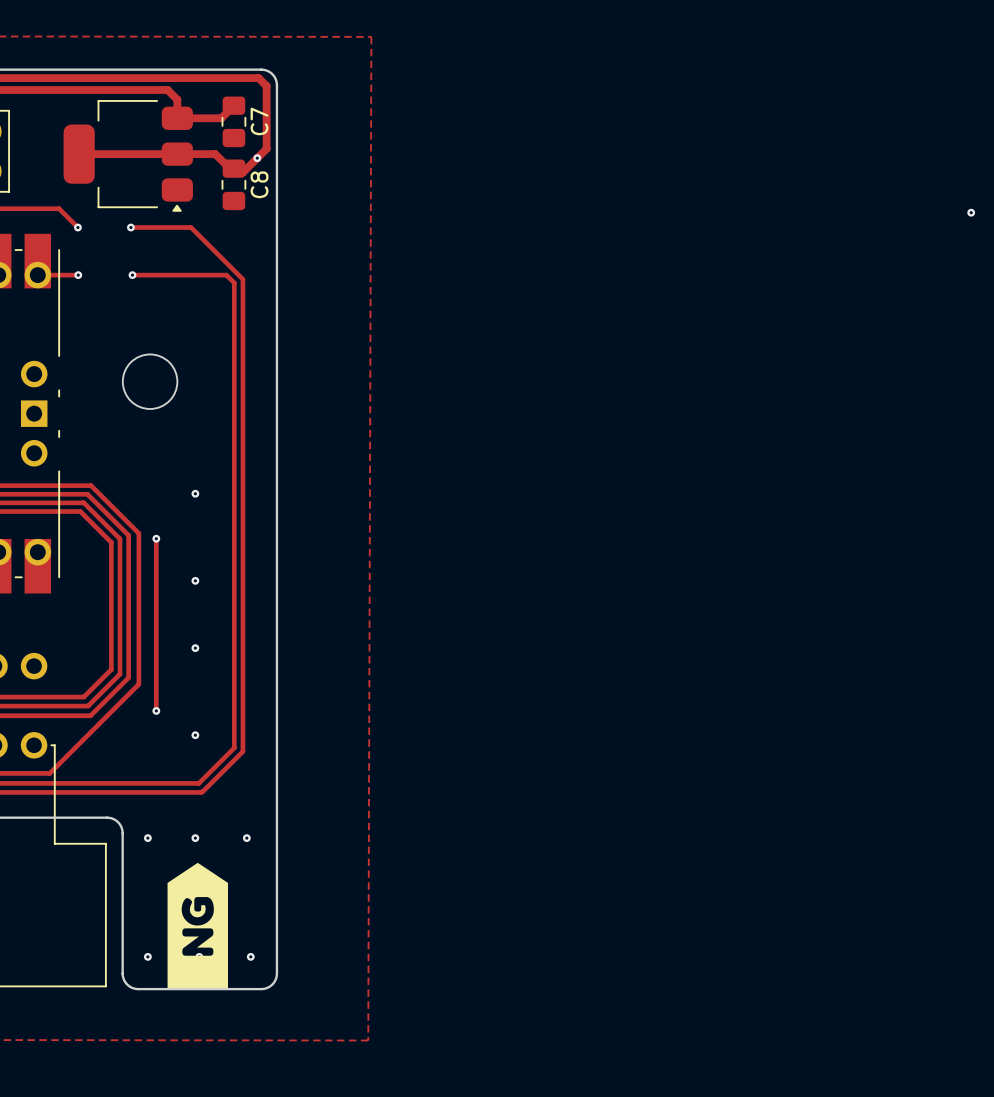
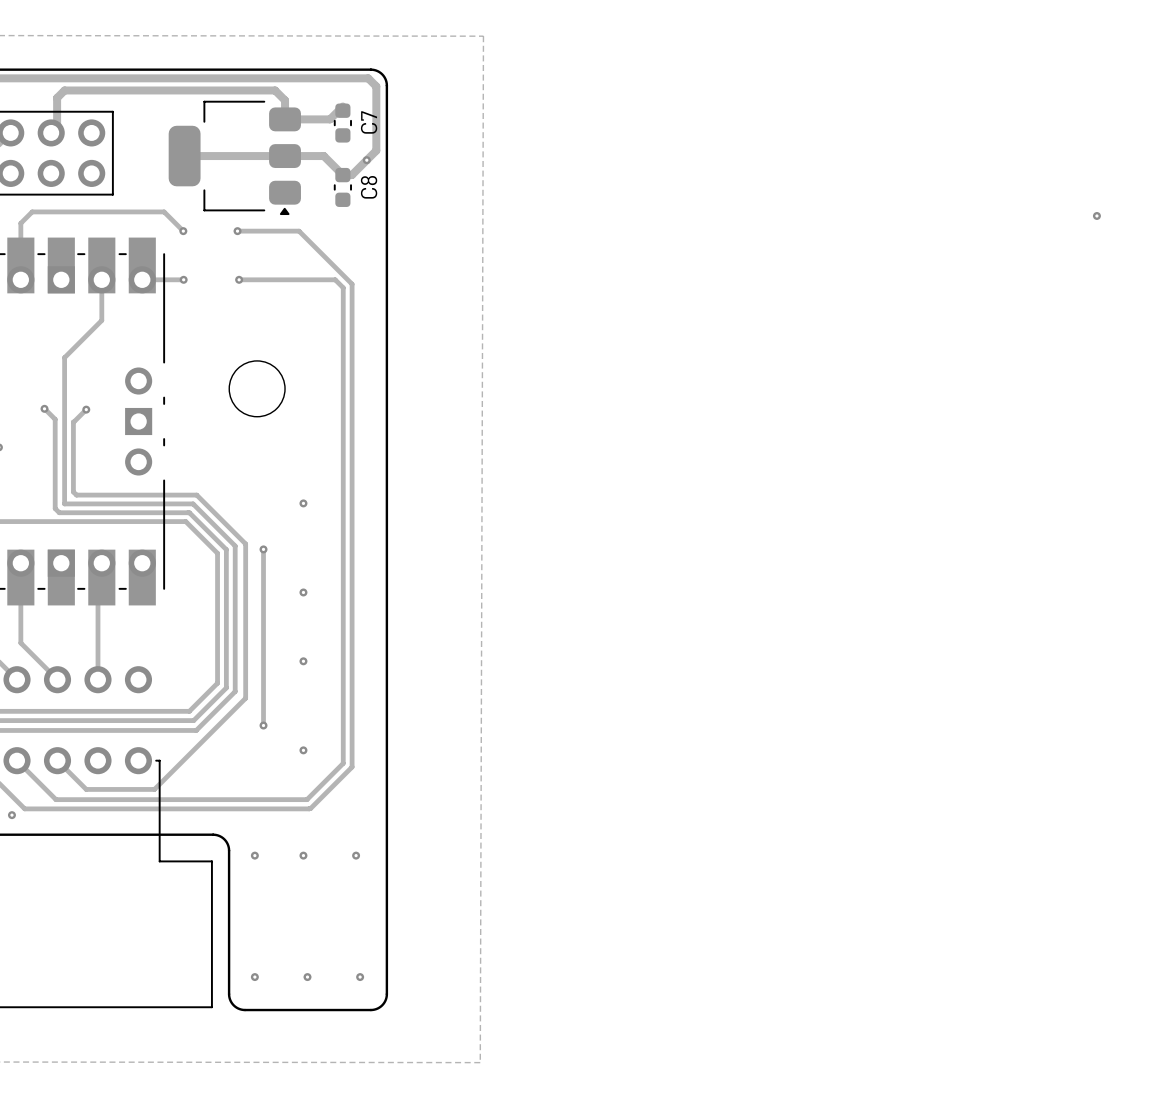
C7 footprint: [221, 96, 247, 148] -> [333, 103, 352, 143]
C8 footprint: [221, 159, 247, 211] -> [333, 167, 352, 207]
drawing: [167, 862, 228, 990] -> none

